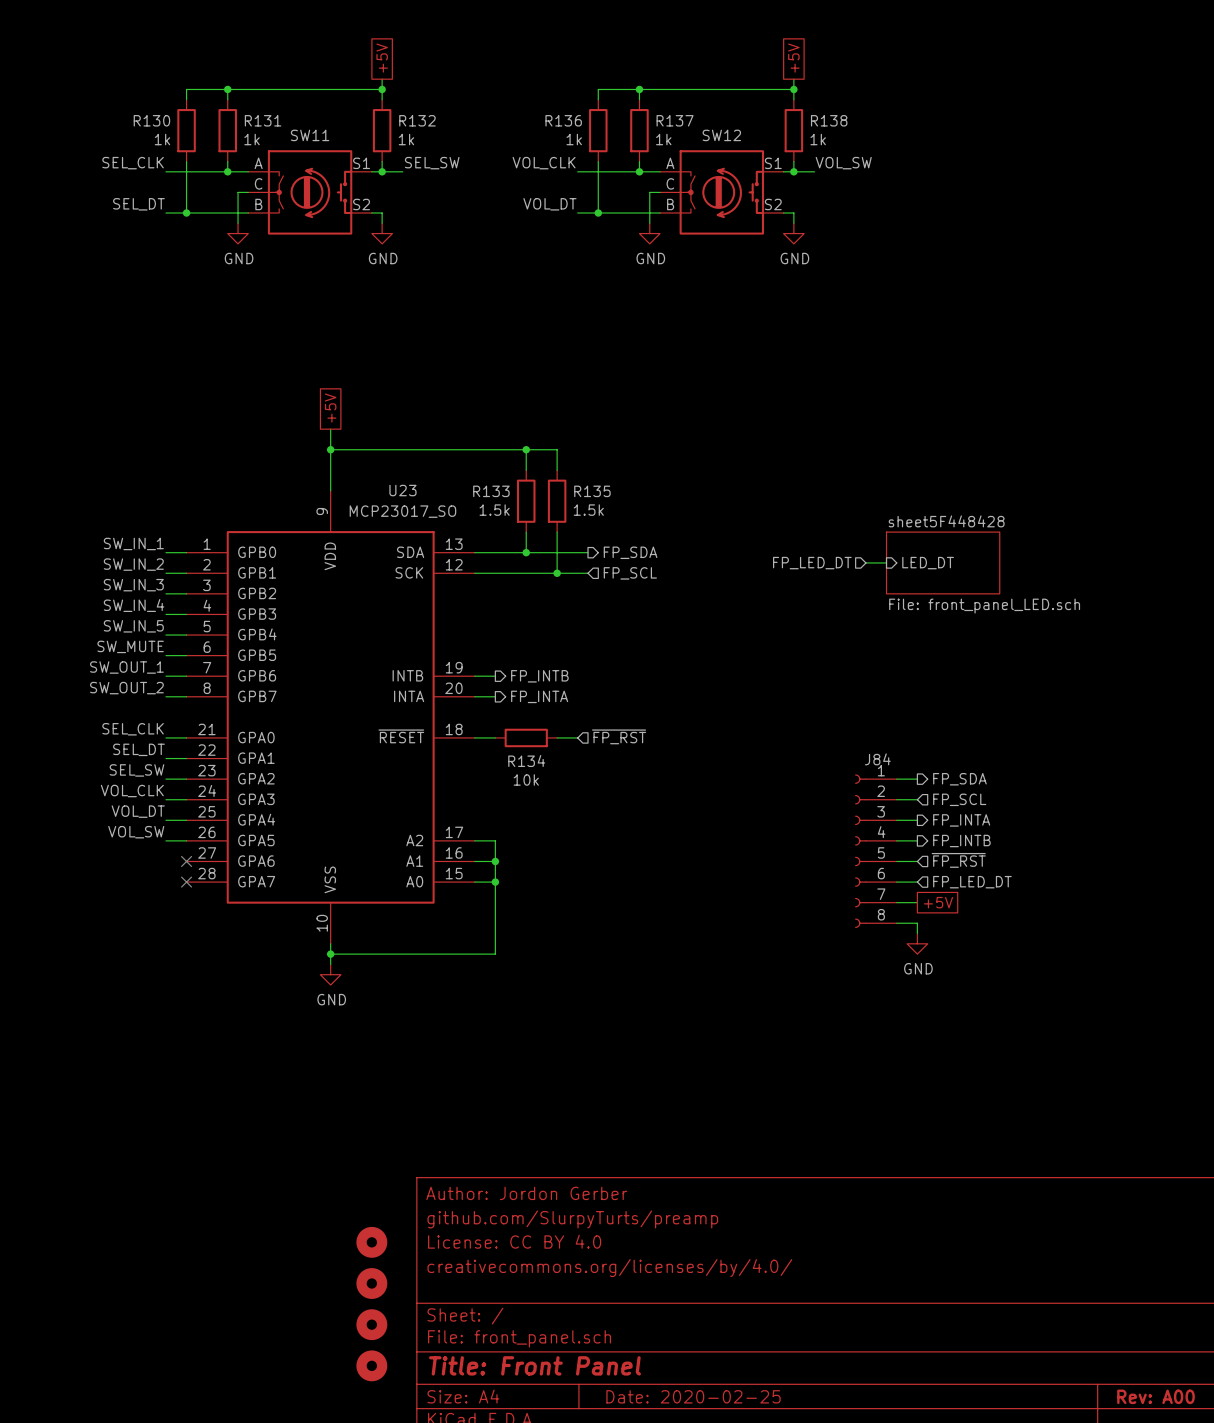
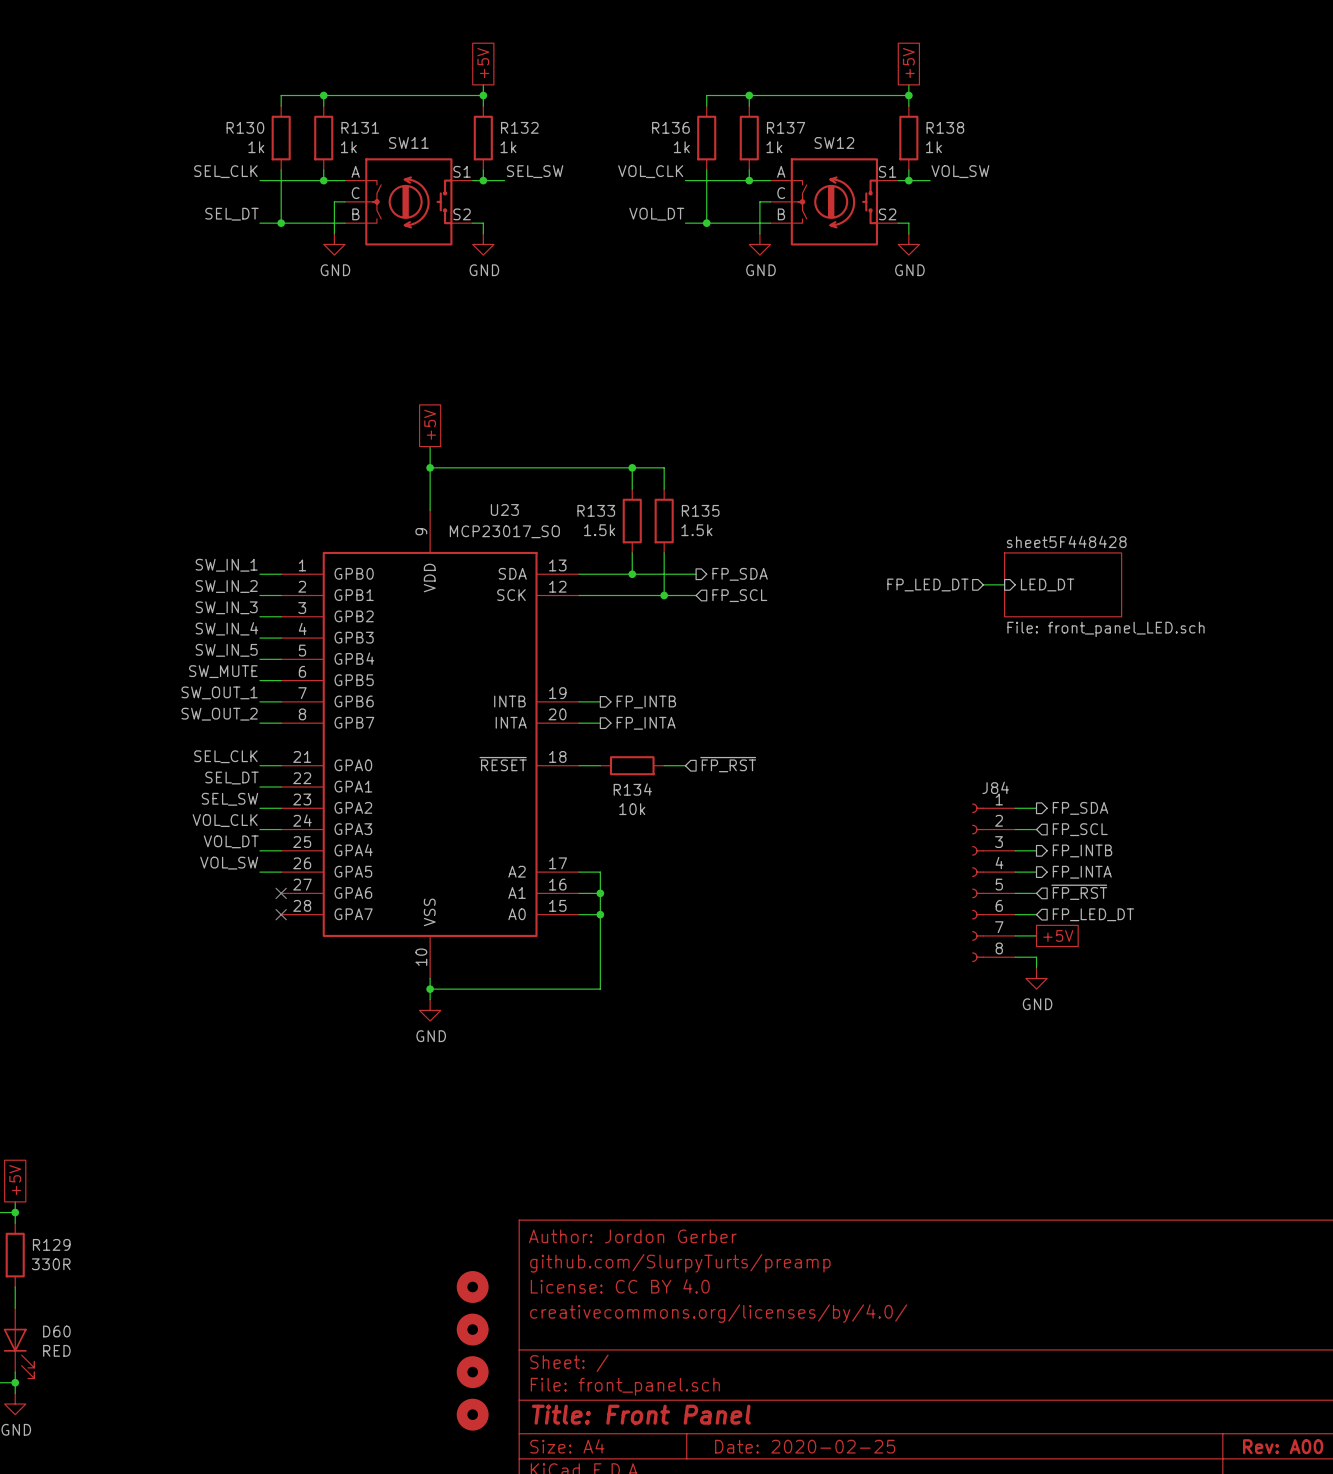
hierarchical label: FP_INTA (961, 820) -> FP_INTB (1082, 850)
hierarchical label: FP_INTB (961, 841) -> FP_INTA (1082, 872)

